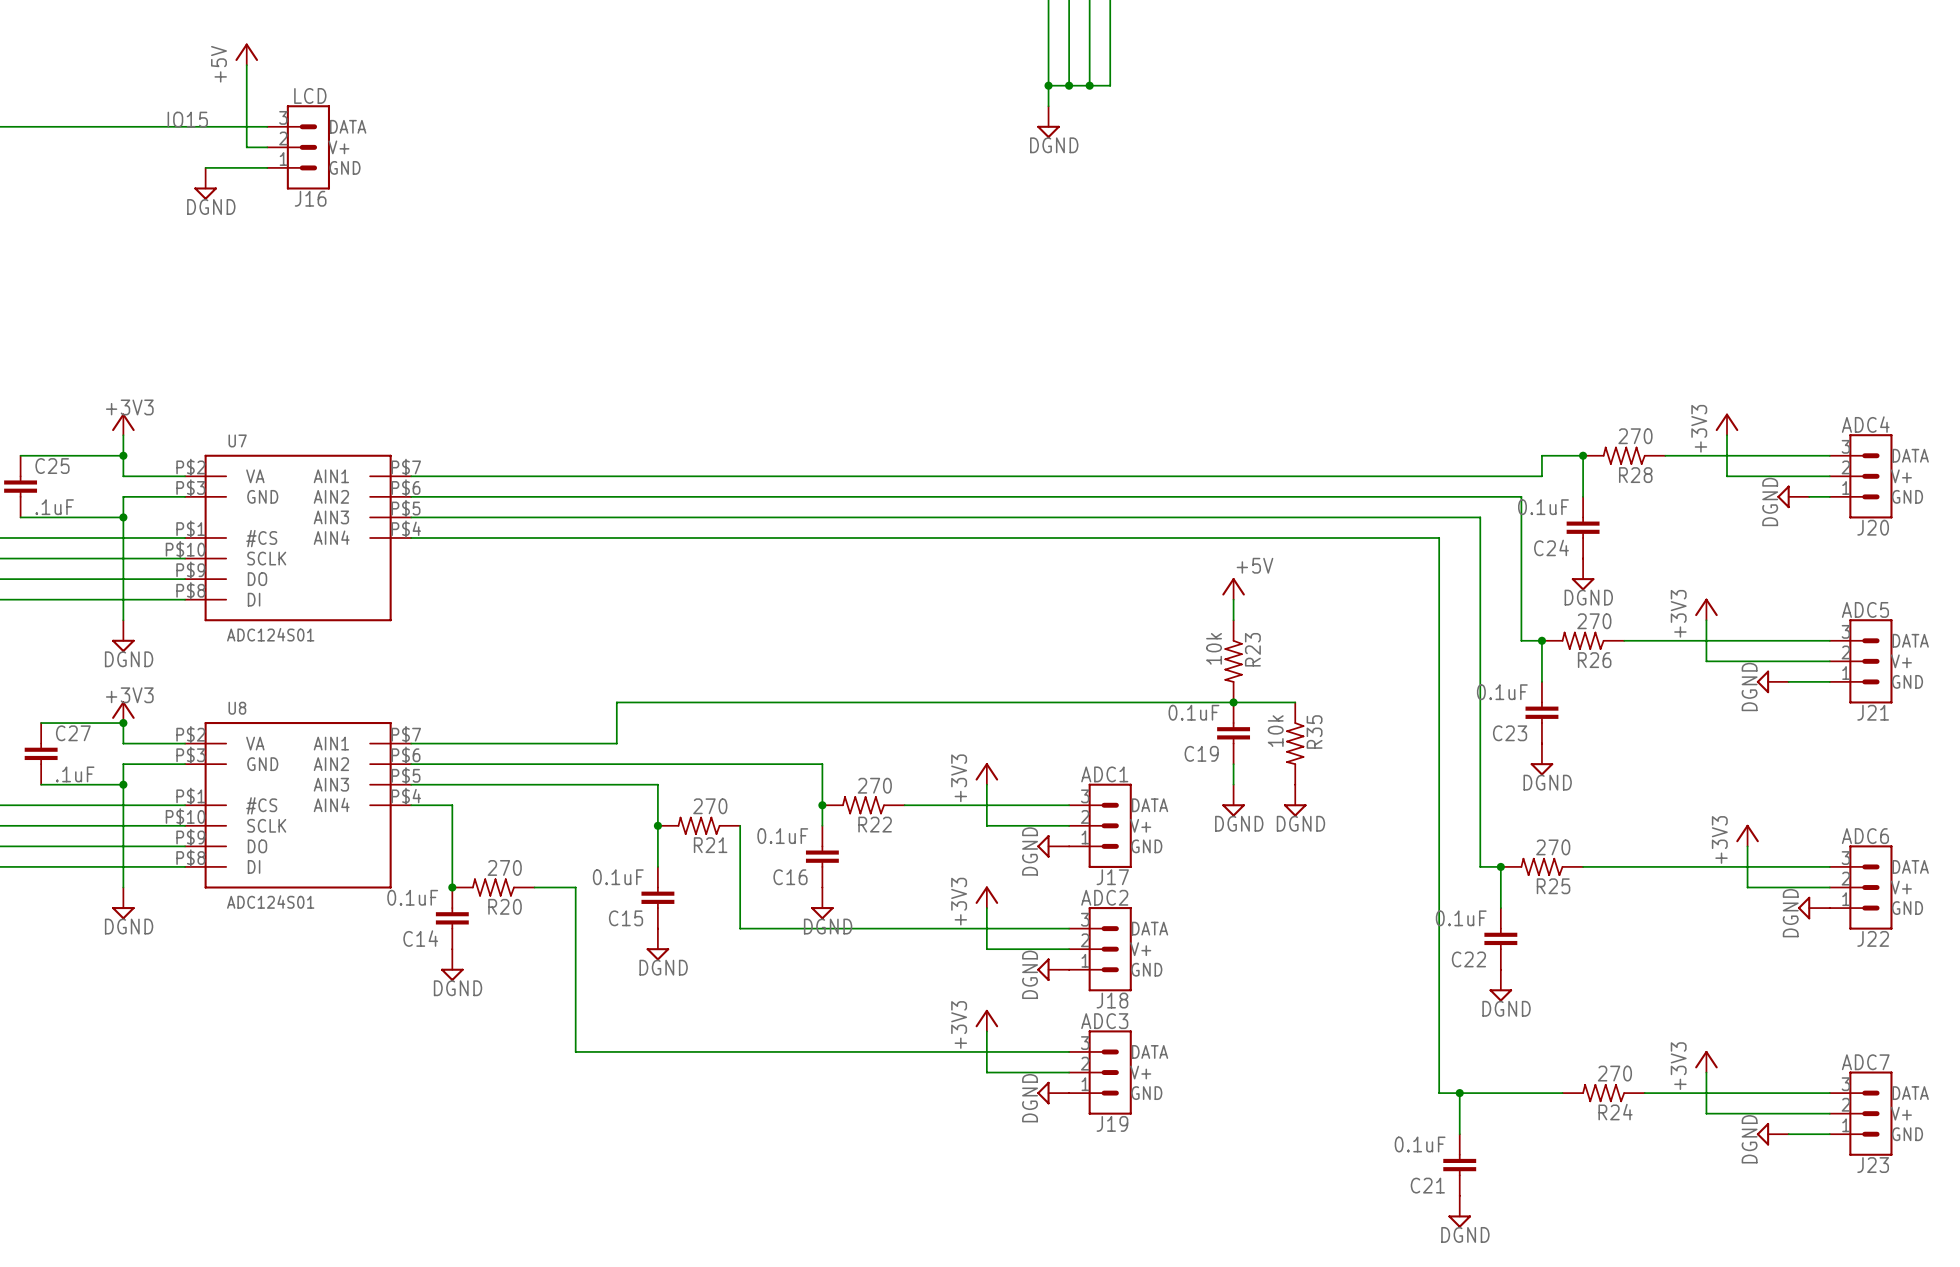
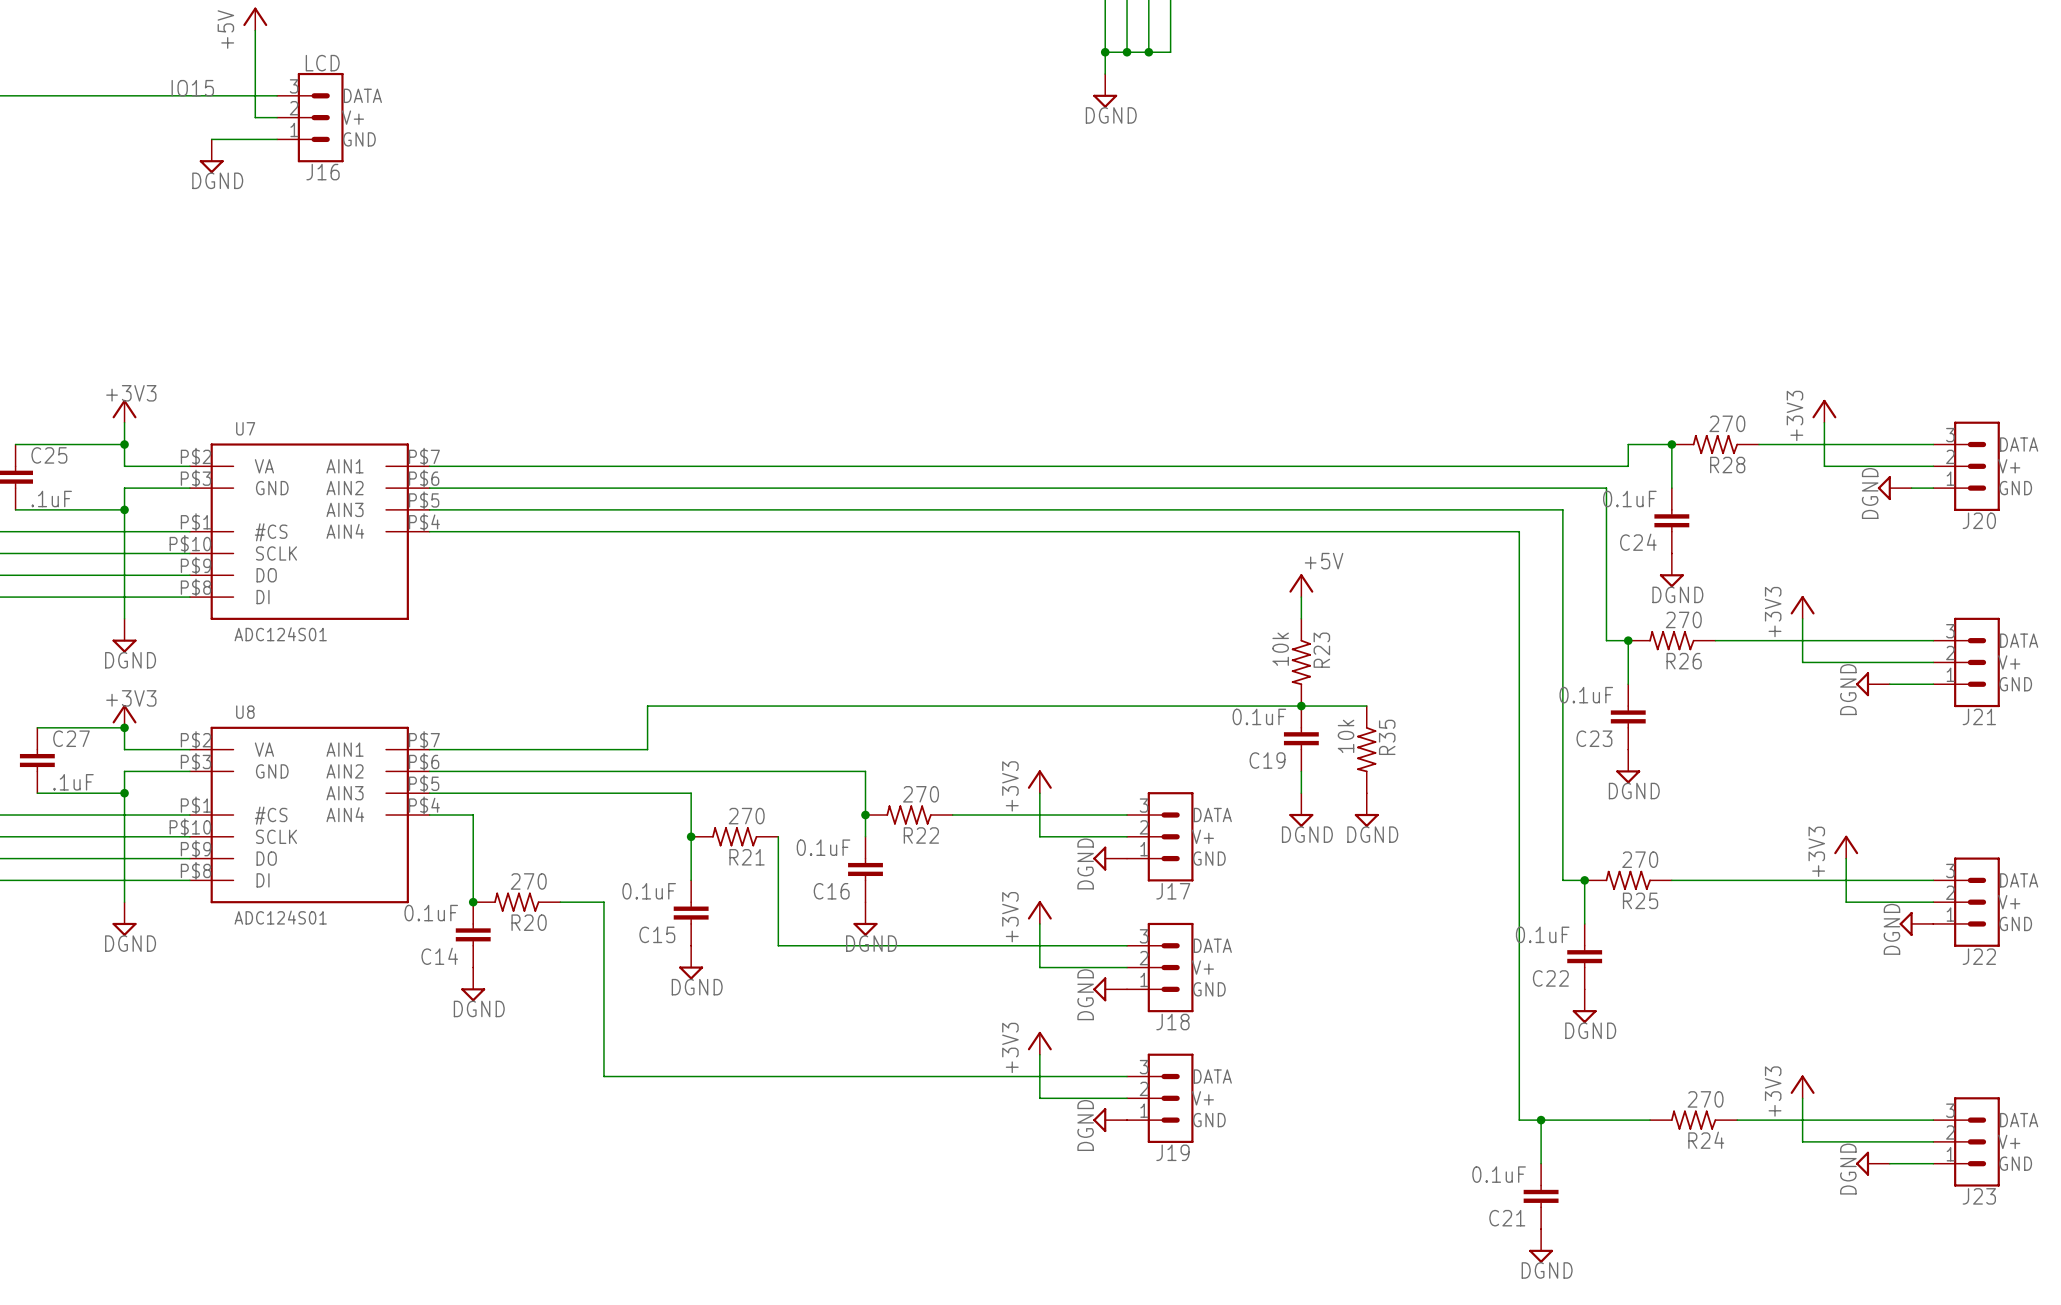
J20 value: ADC4 (1865, 424) -> none
J21 value: ADC5 (1865, 609) -> none
J17 value: ADC1 (1104, 774) -> none
J22 value: ADC6 (1865, 836) -> none
J18 value: ADC2 (1104, 897) -> none
J19 value: ADC3 (1104, 1021) -> none
J23 value: ADC7 (1865, 1062) -> none

